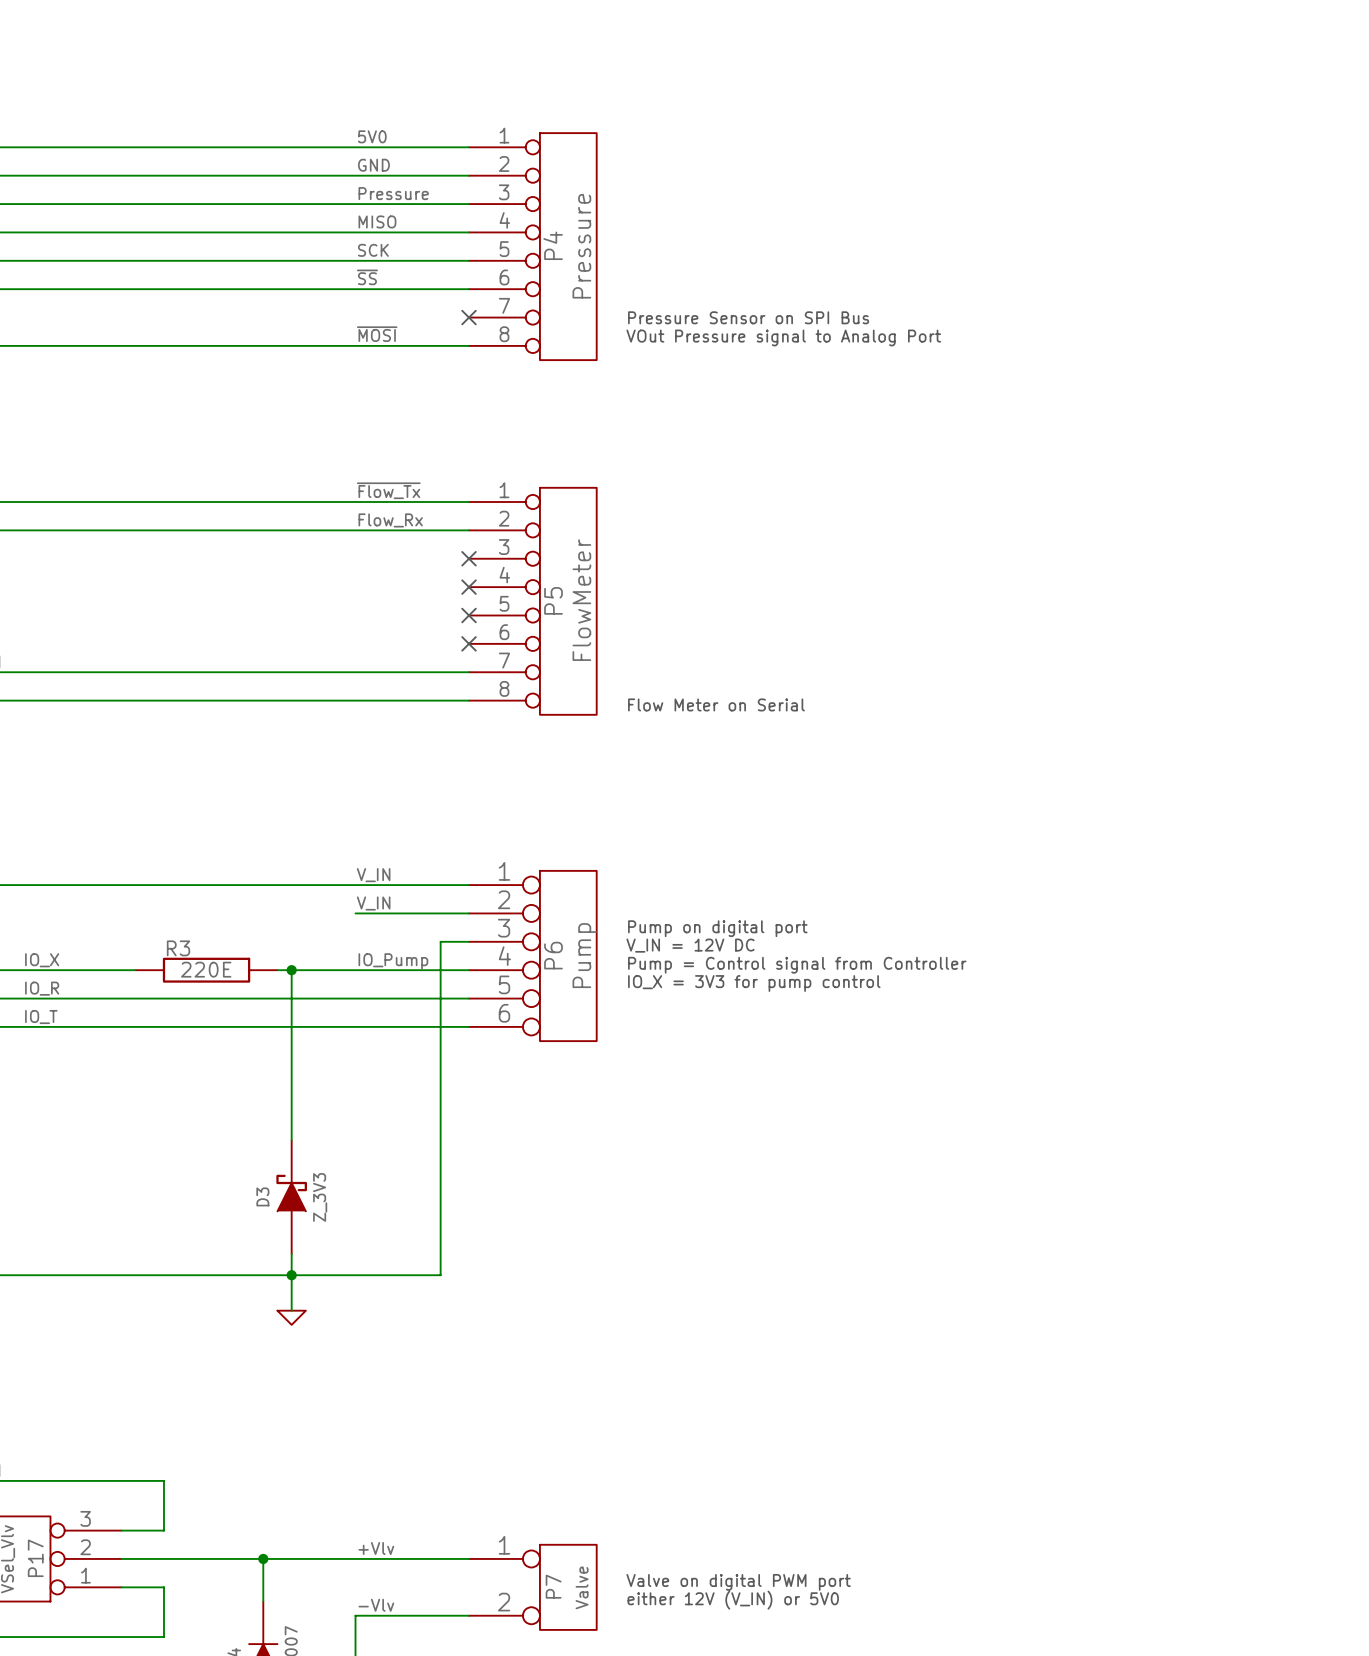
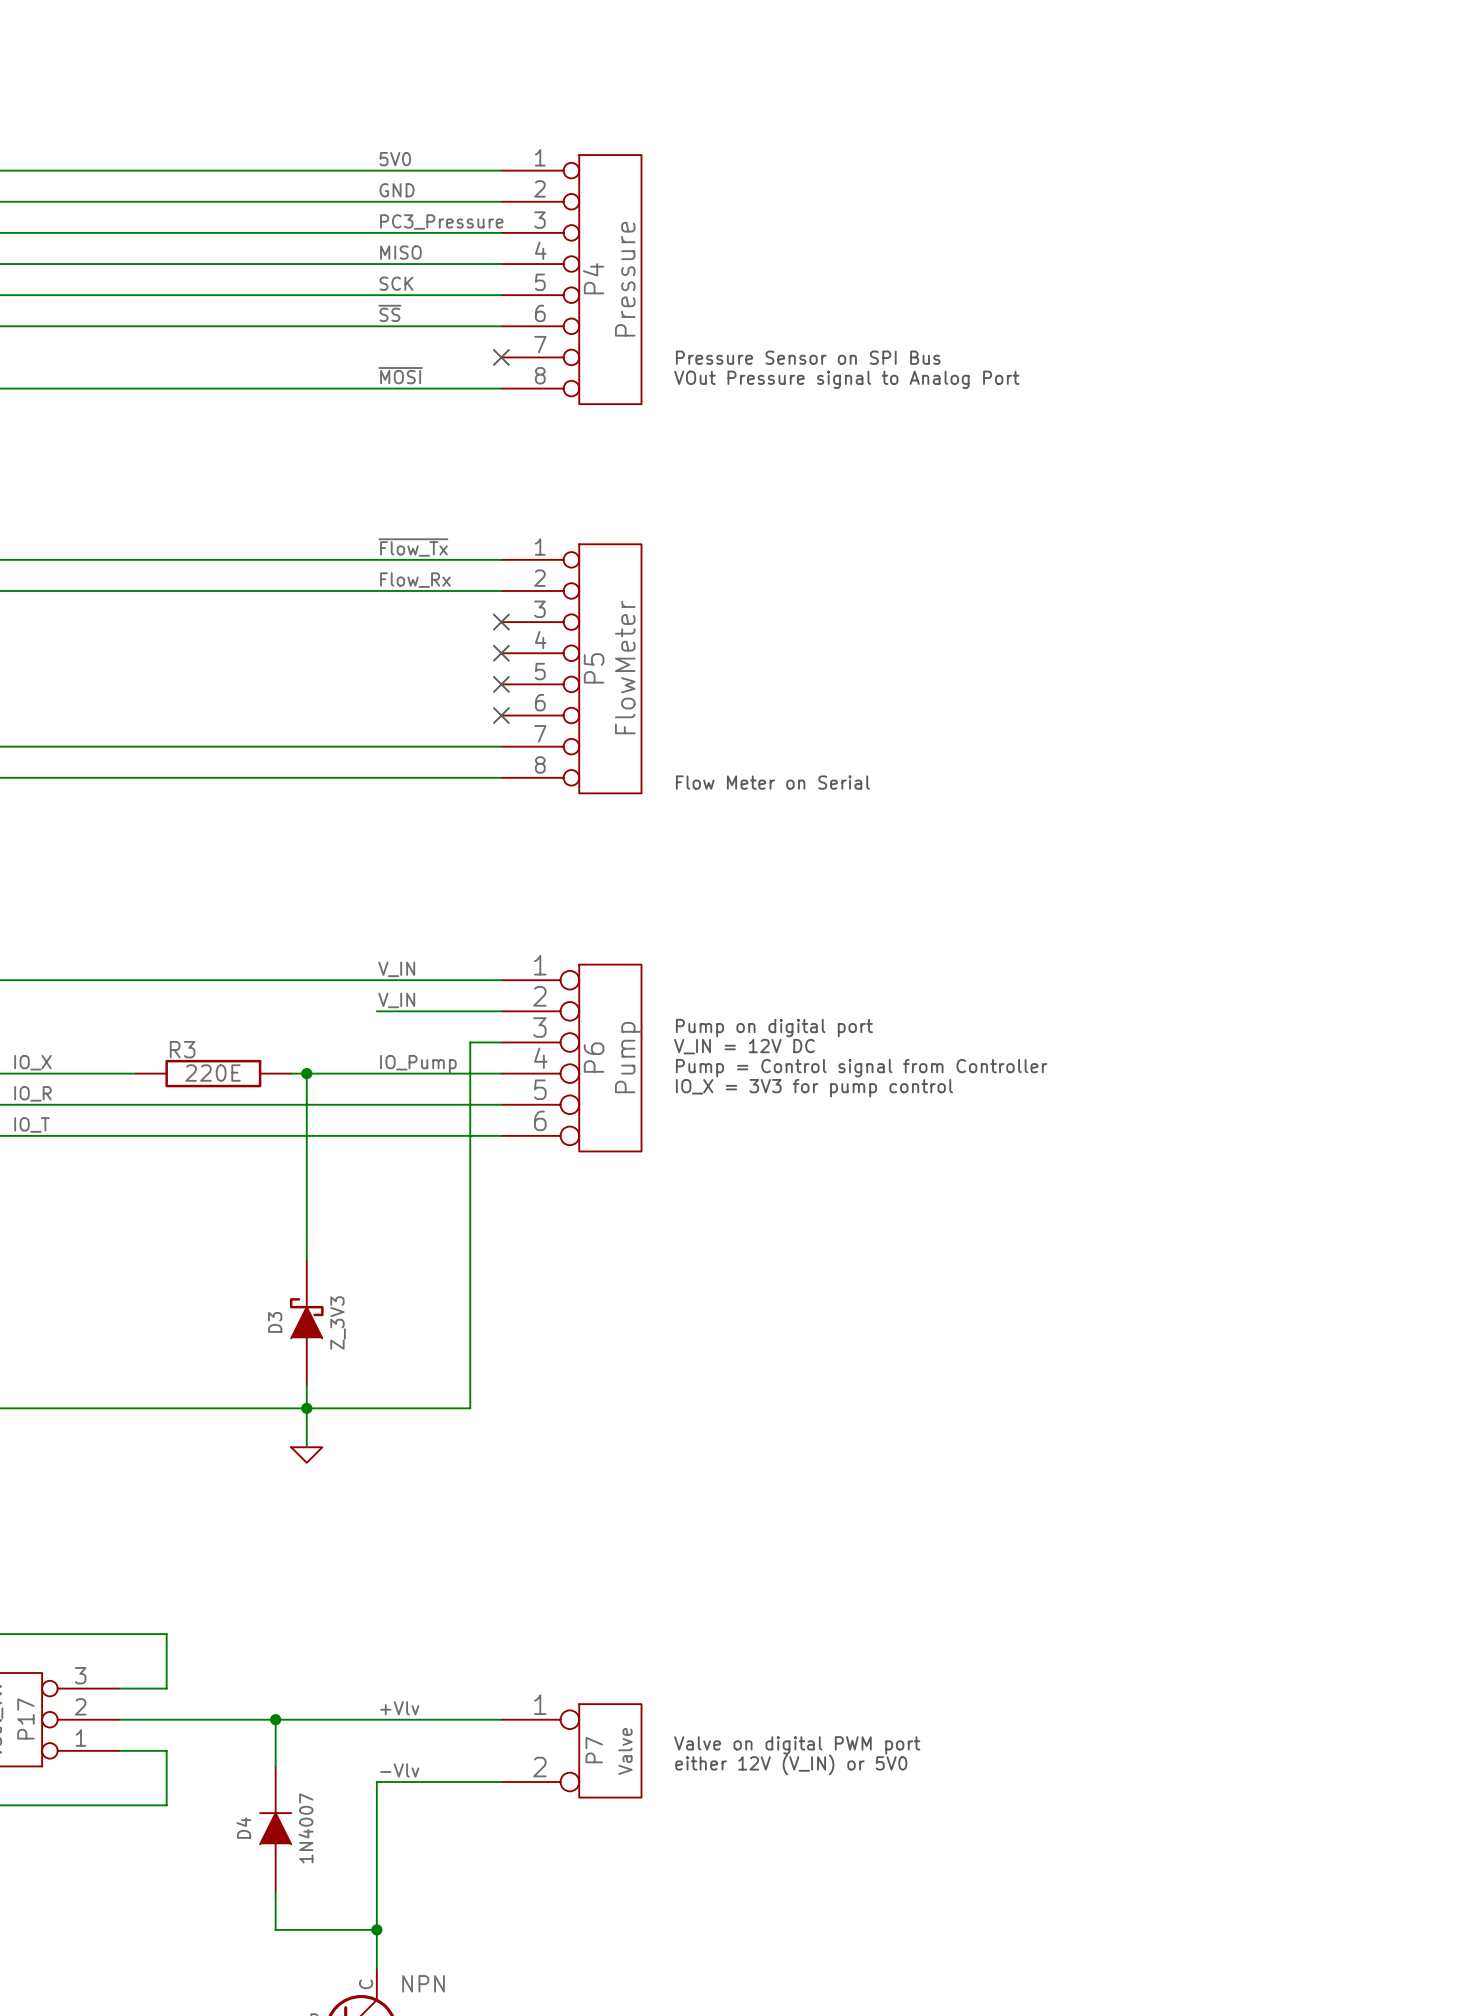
label: Pressure (393, 193) -> PC3_Pressure (441, 222)

